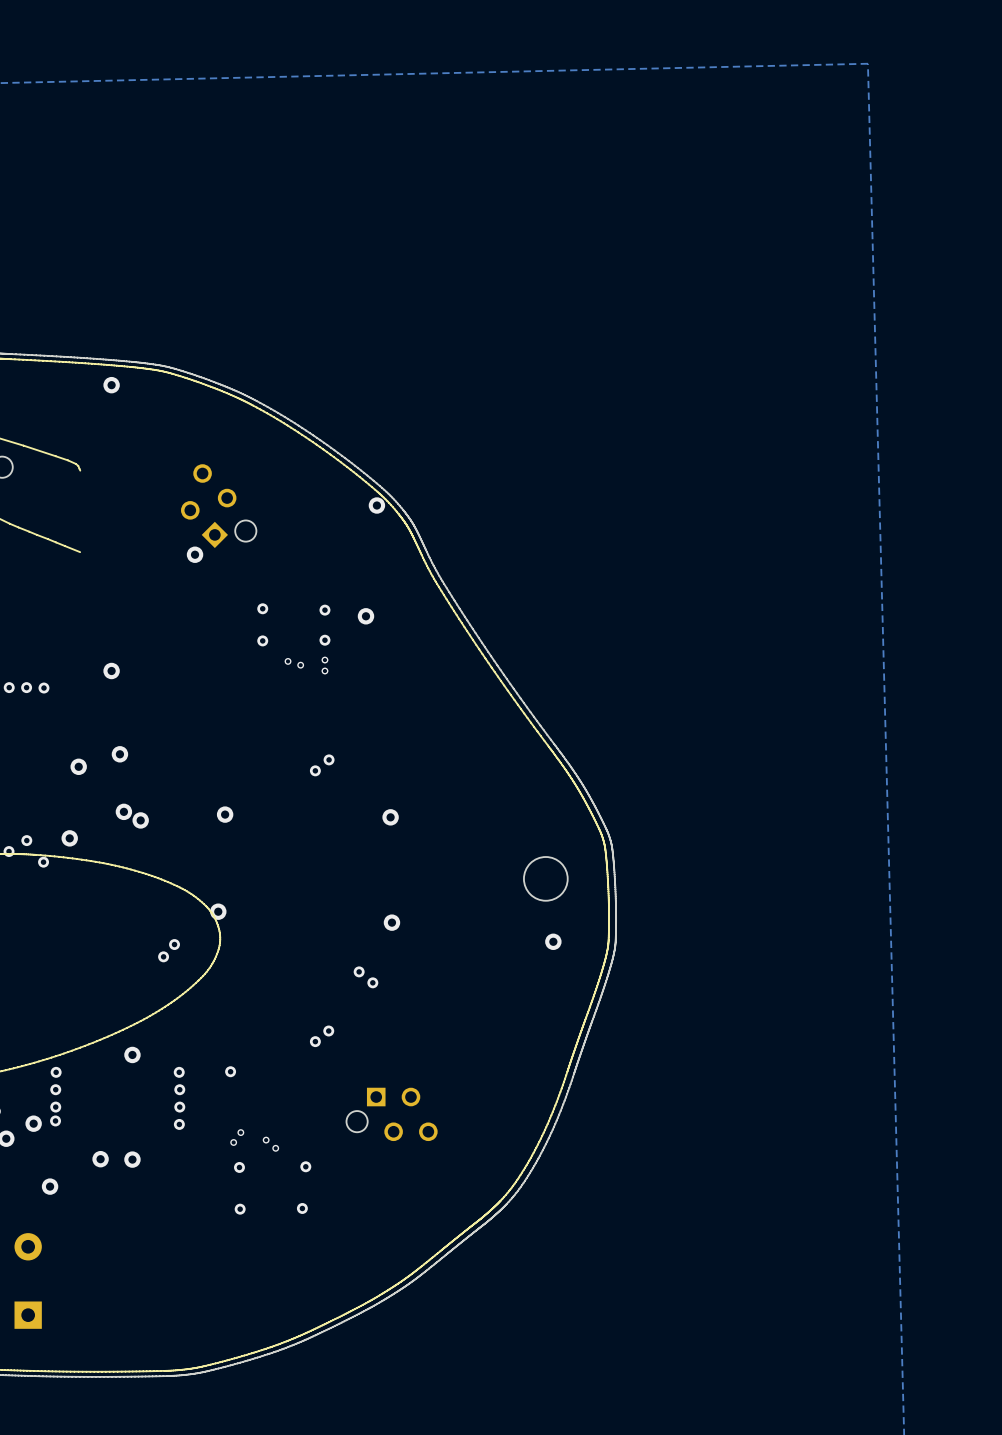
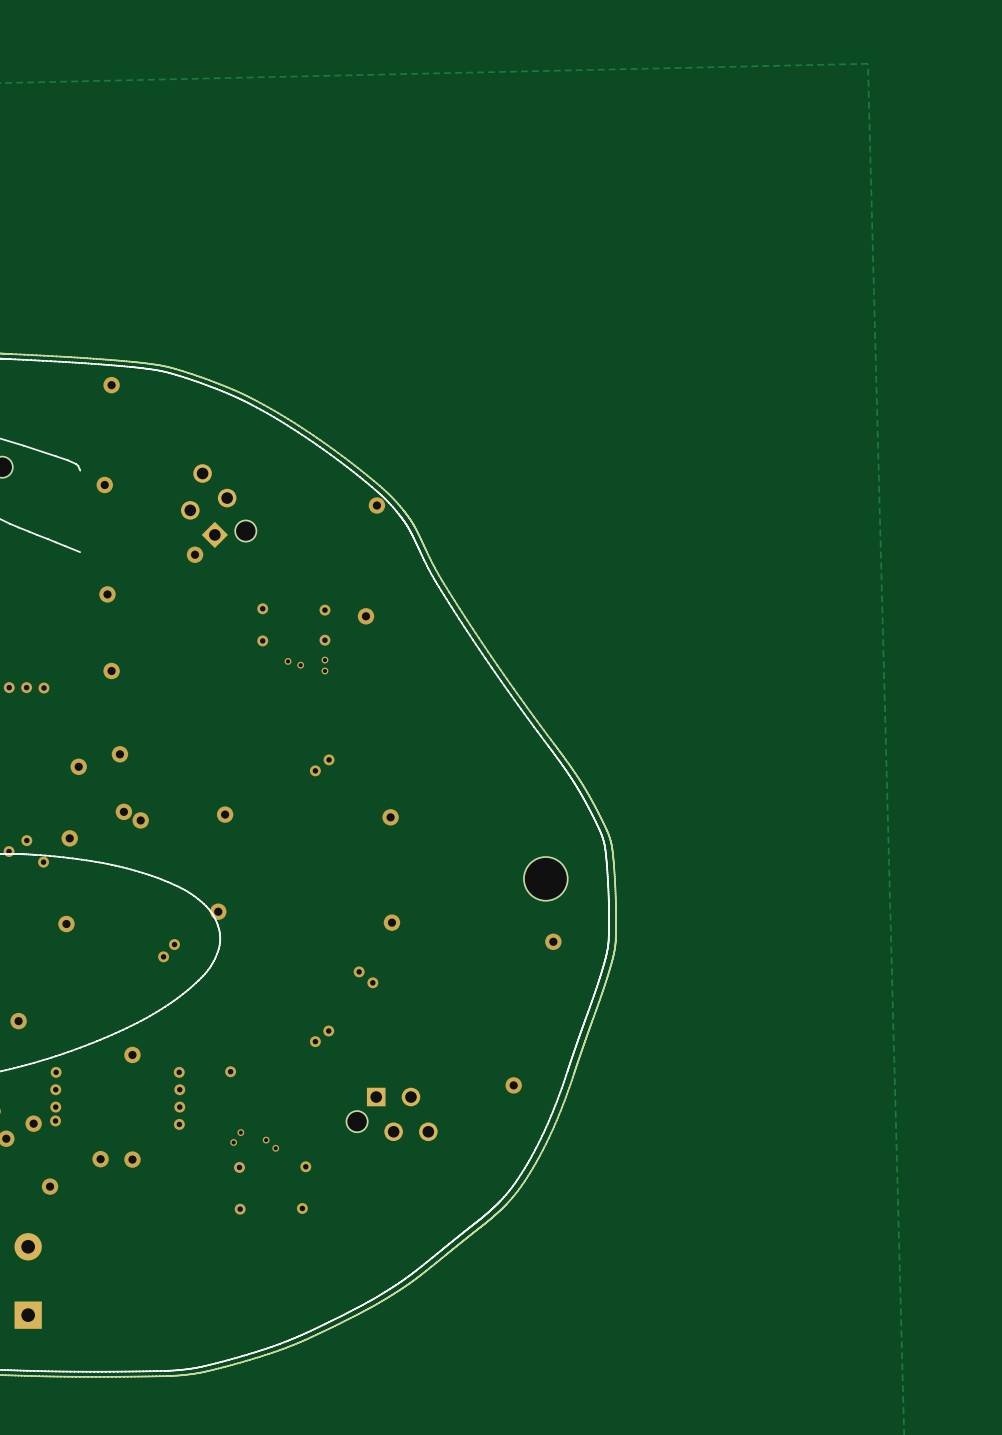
via: none -> (104, 484)
via: none -> (107, 594)
via: none -> (66, 924)
via: none -> (18, 1021)
via: none -> (513, 1085)

